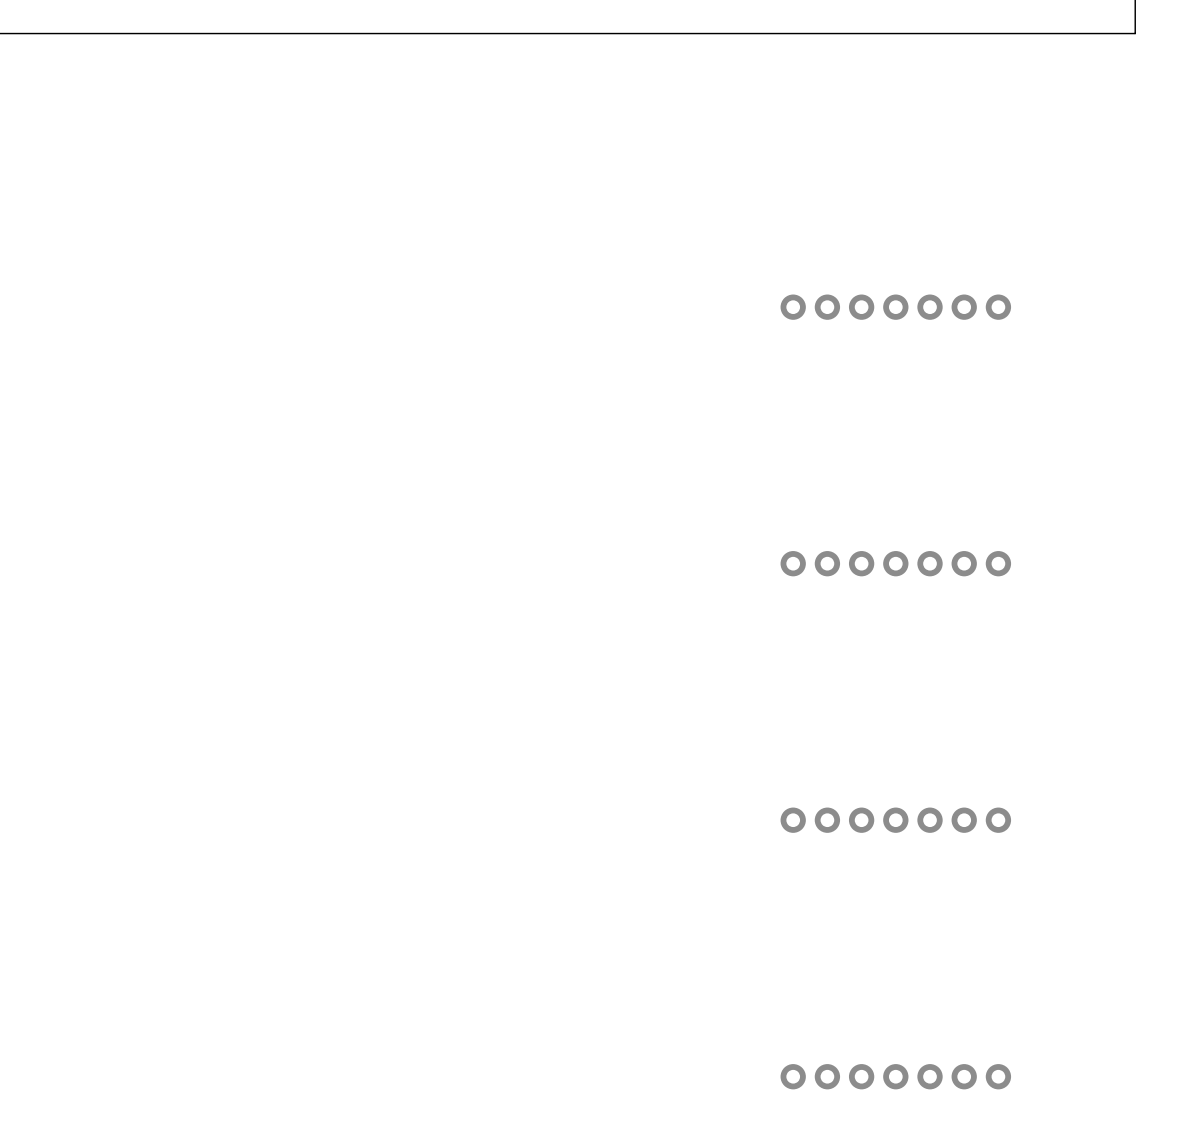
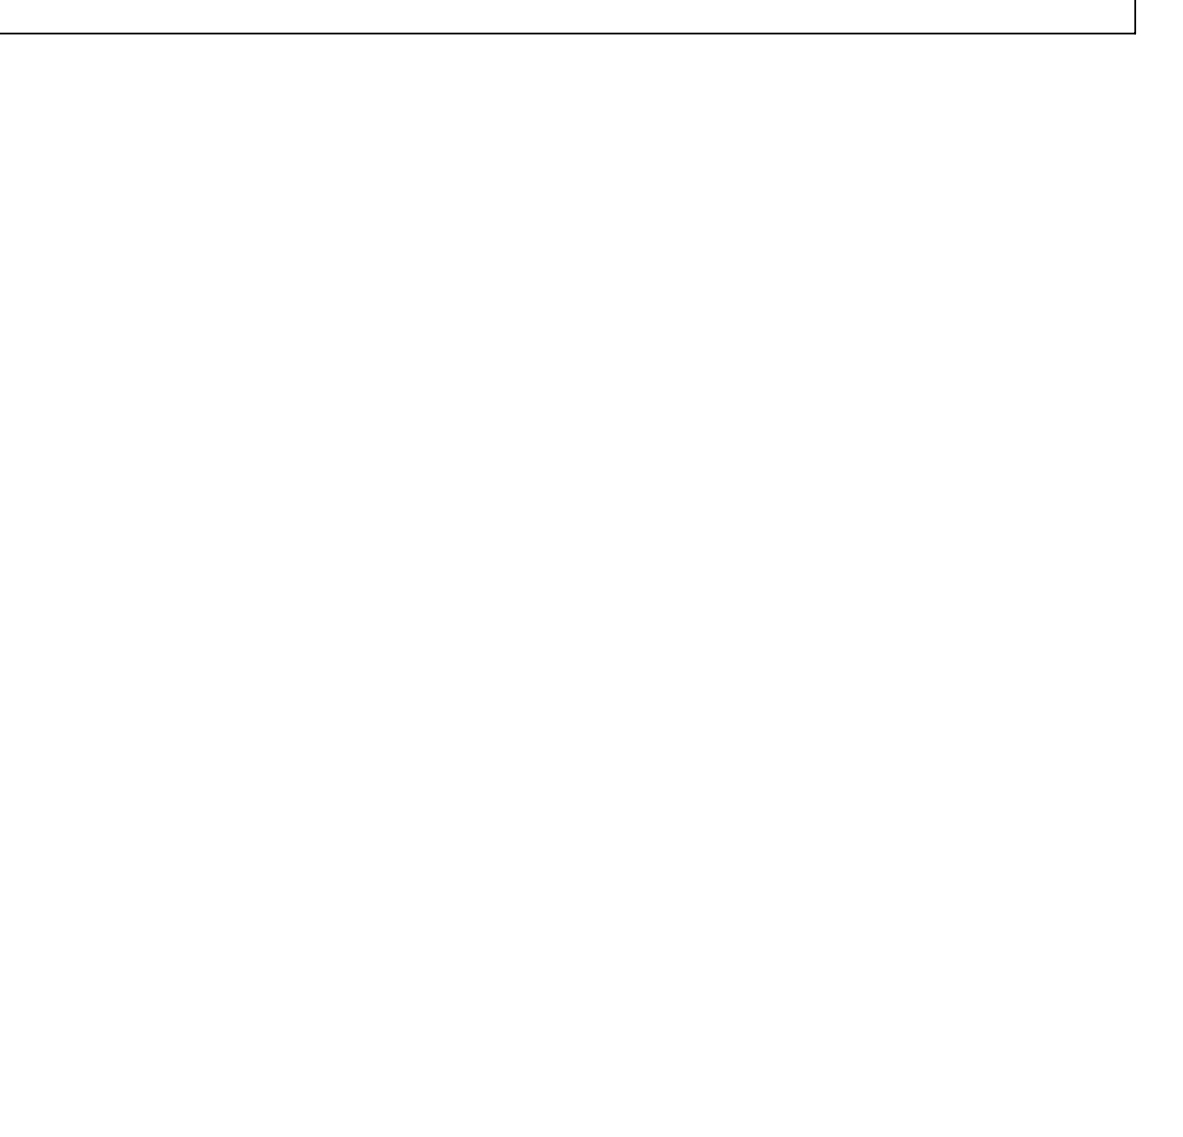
part: (895, 307) -> none
part: (895, 563) -> none
part: (895, 820) -> none
part: (895, 1076) -> none

